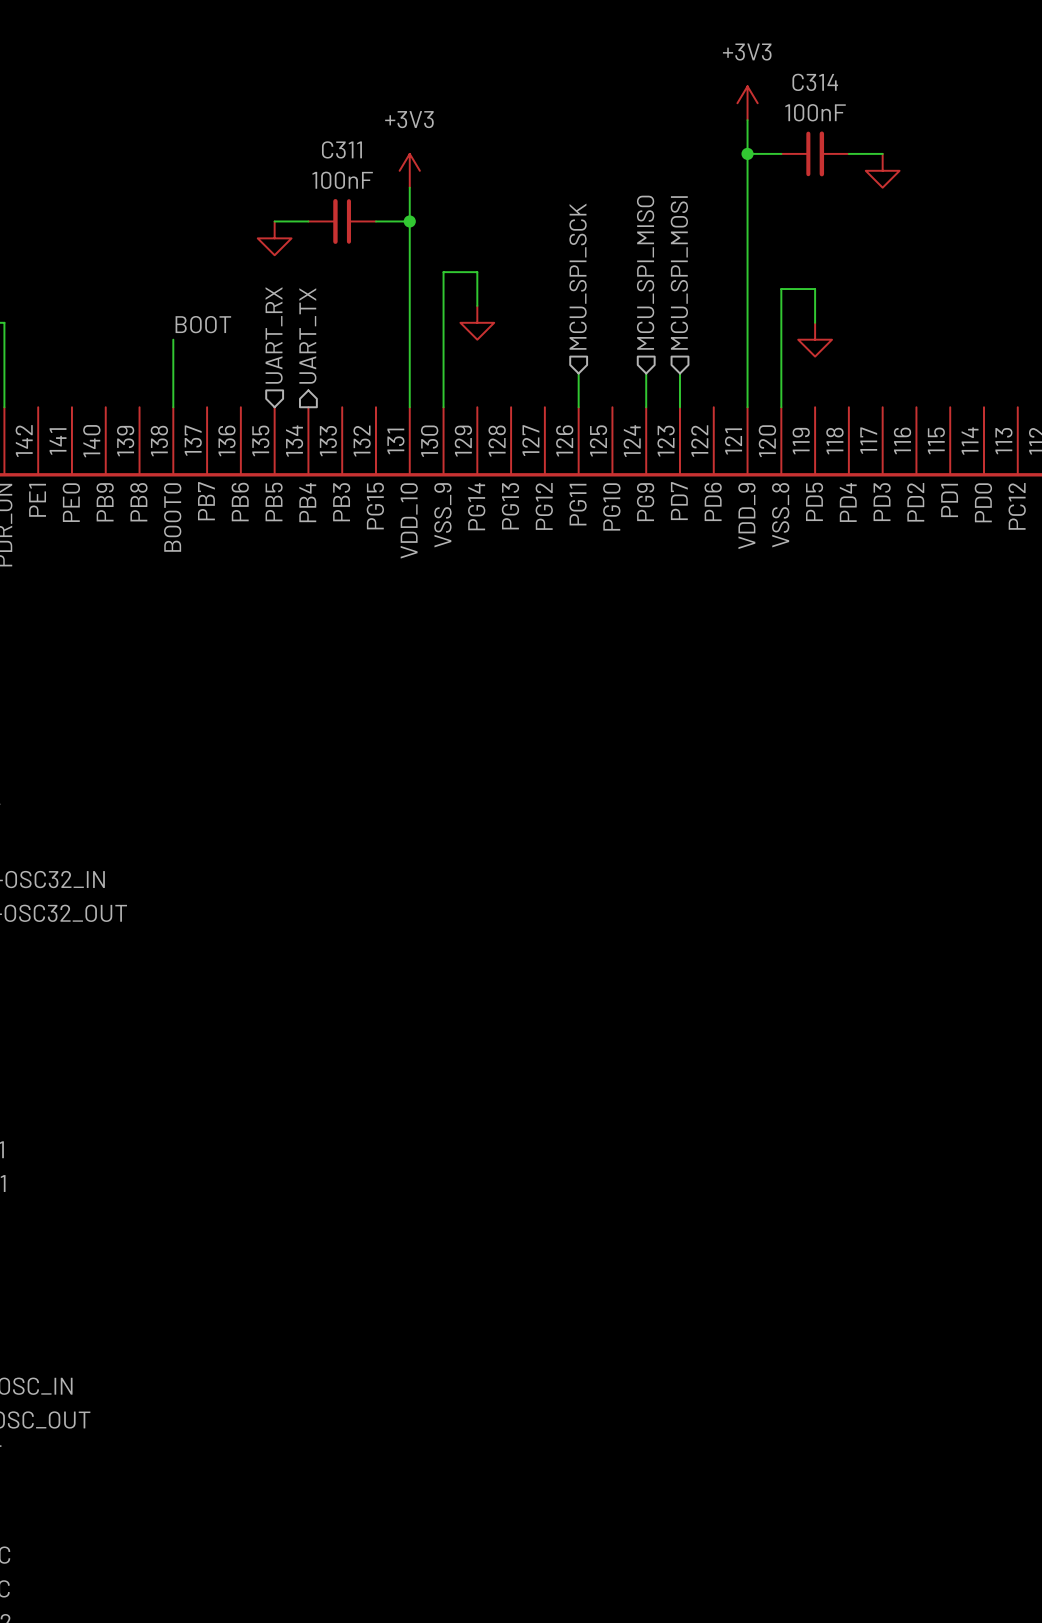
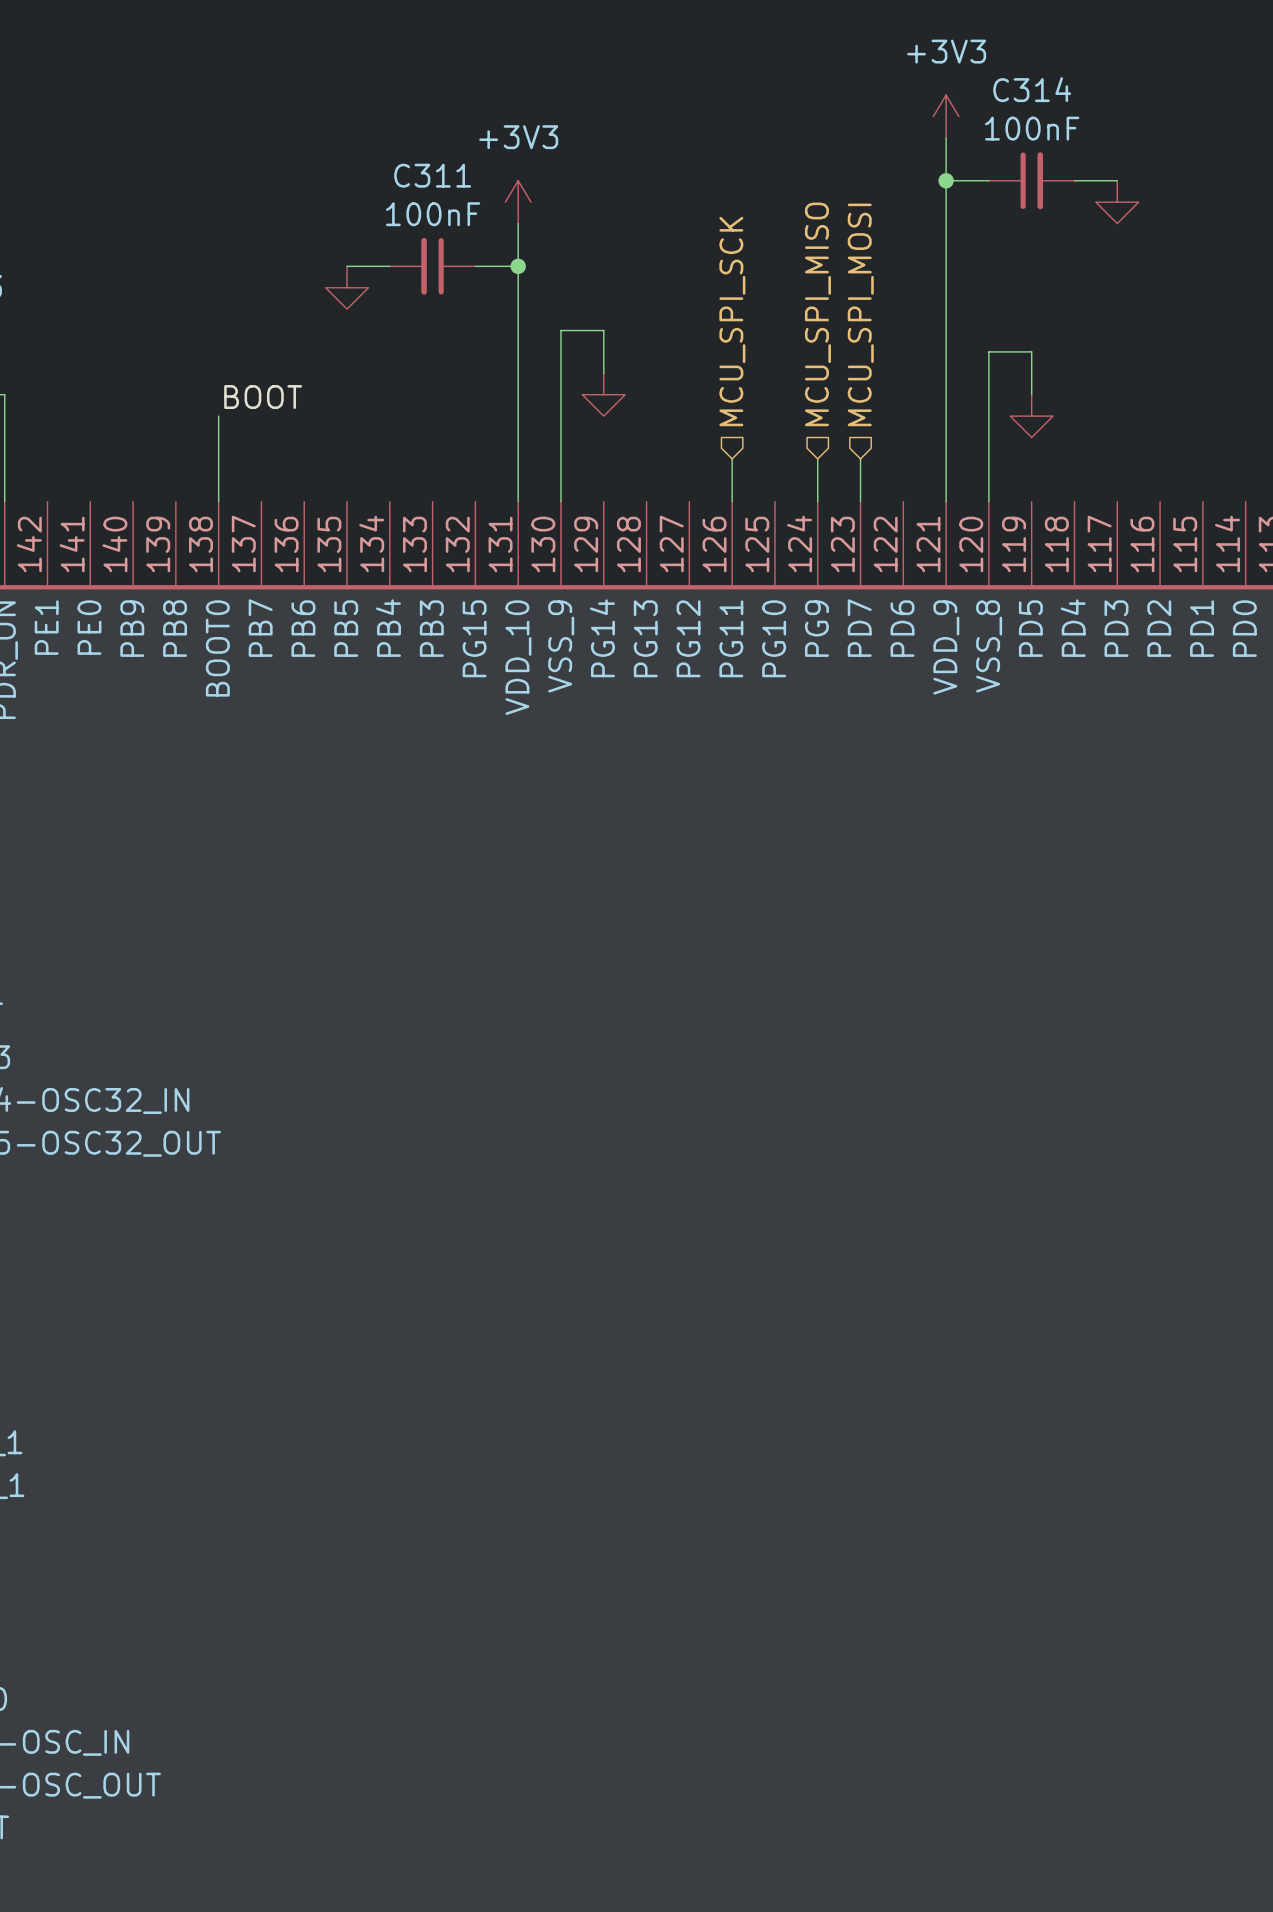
hierarchical label: UART_RX (274, 335) -> none
hierarchical label: UART_TX (307, 336) -> none

